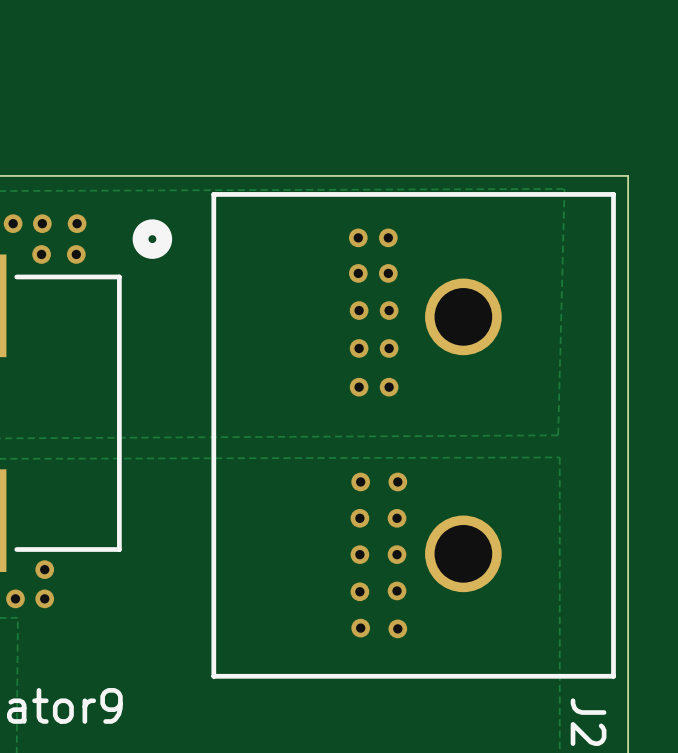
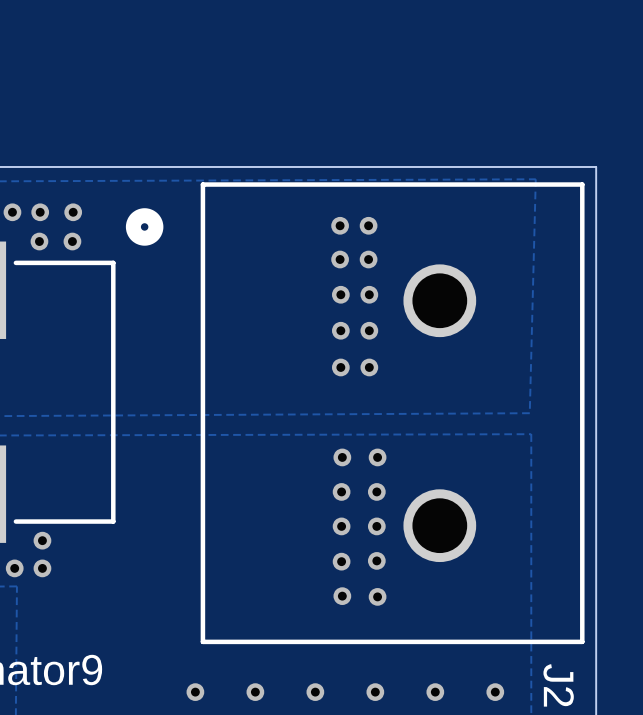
via: none -> (195, 692)
via: none -> (255, 692)
via: none -> (315, 692)
via: none -> (375, 692)
via: none -> (435, 692)
via: none -> (495, 692)

